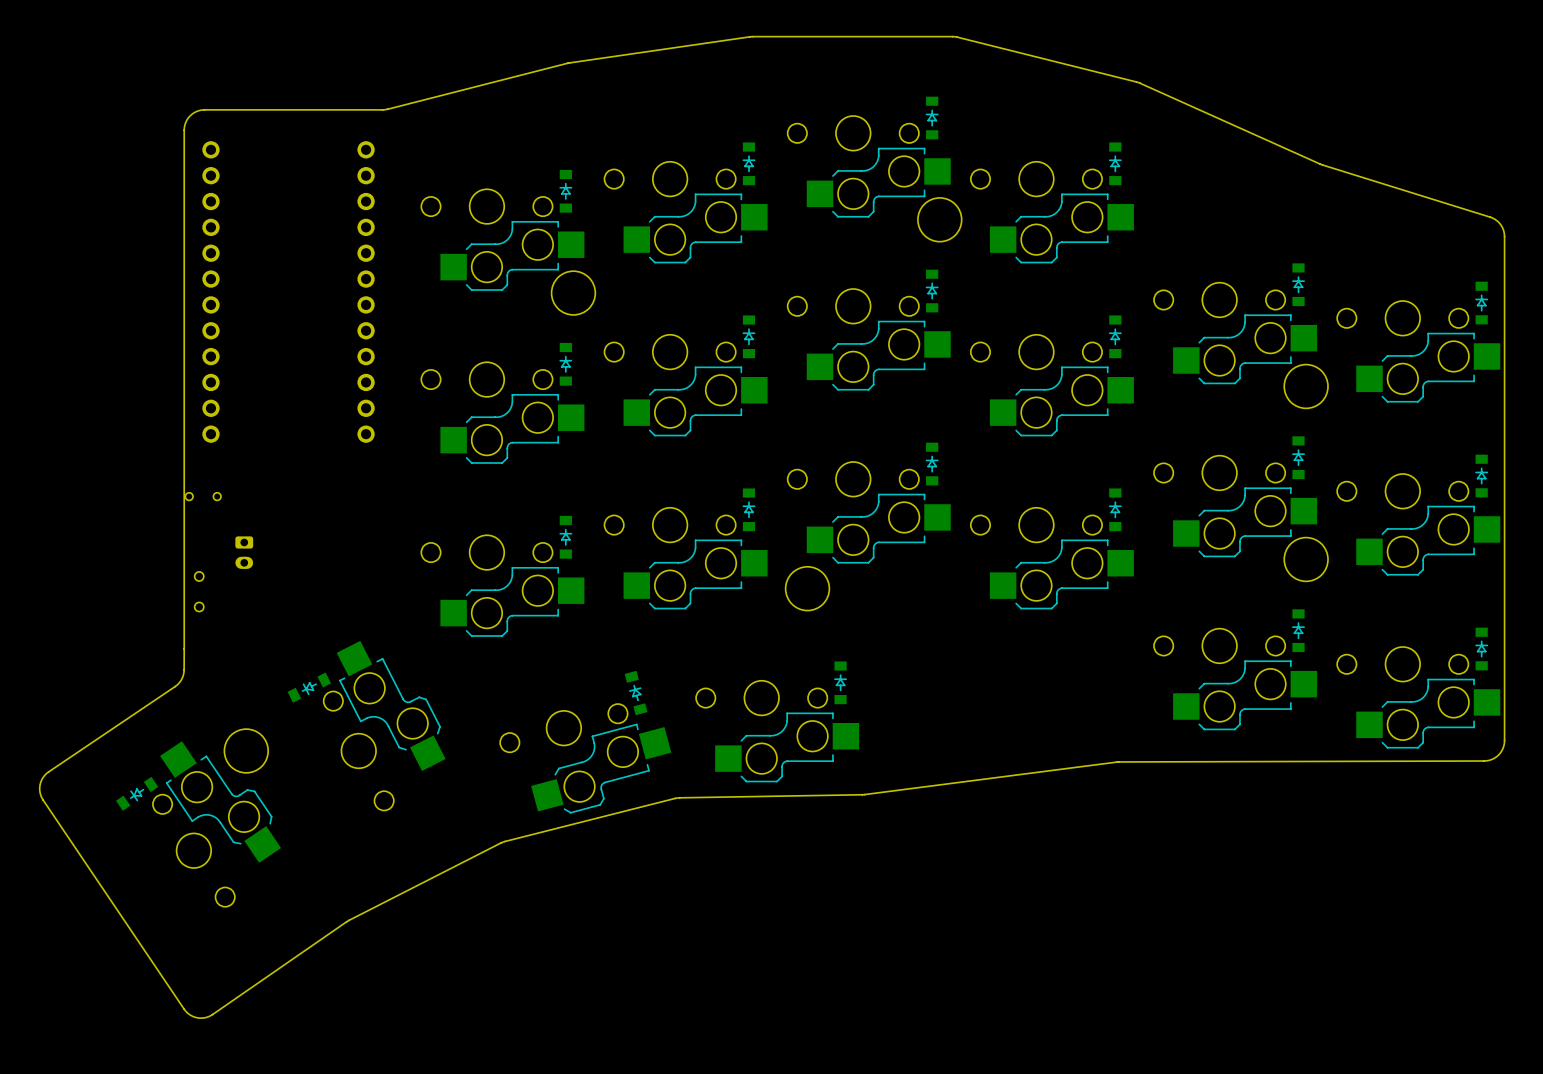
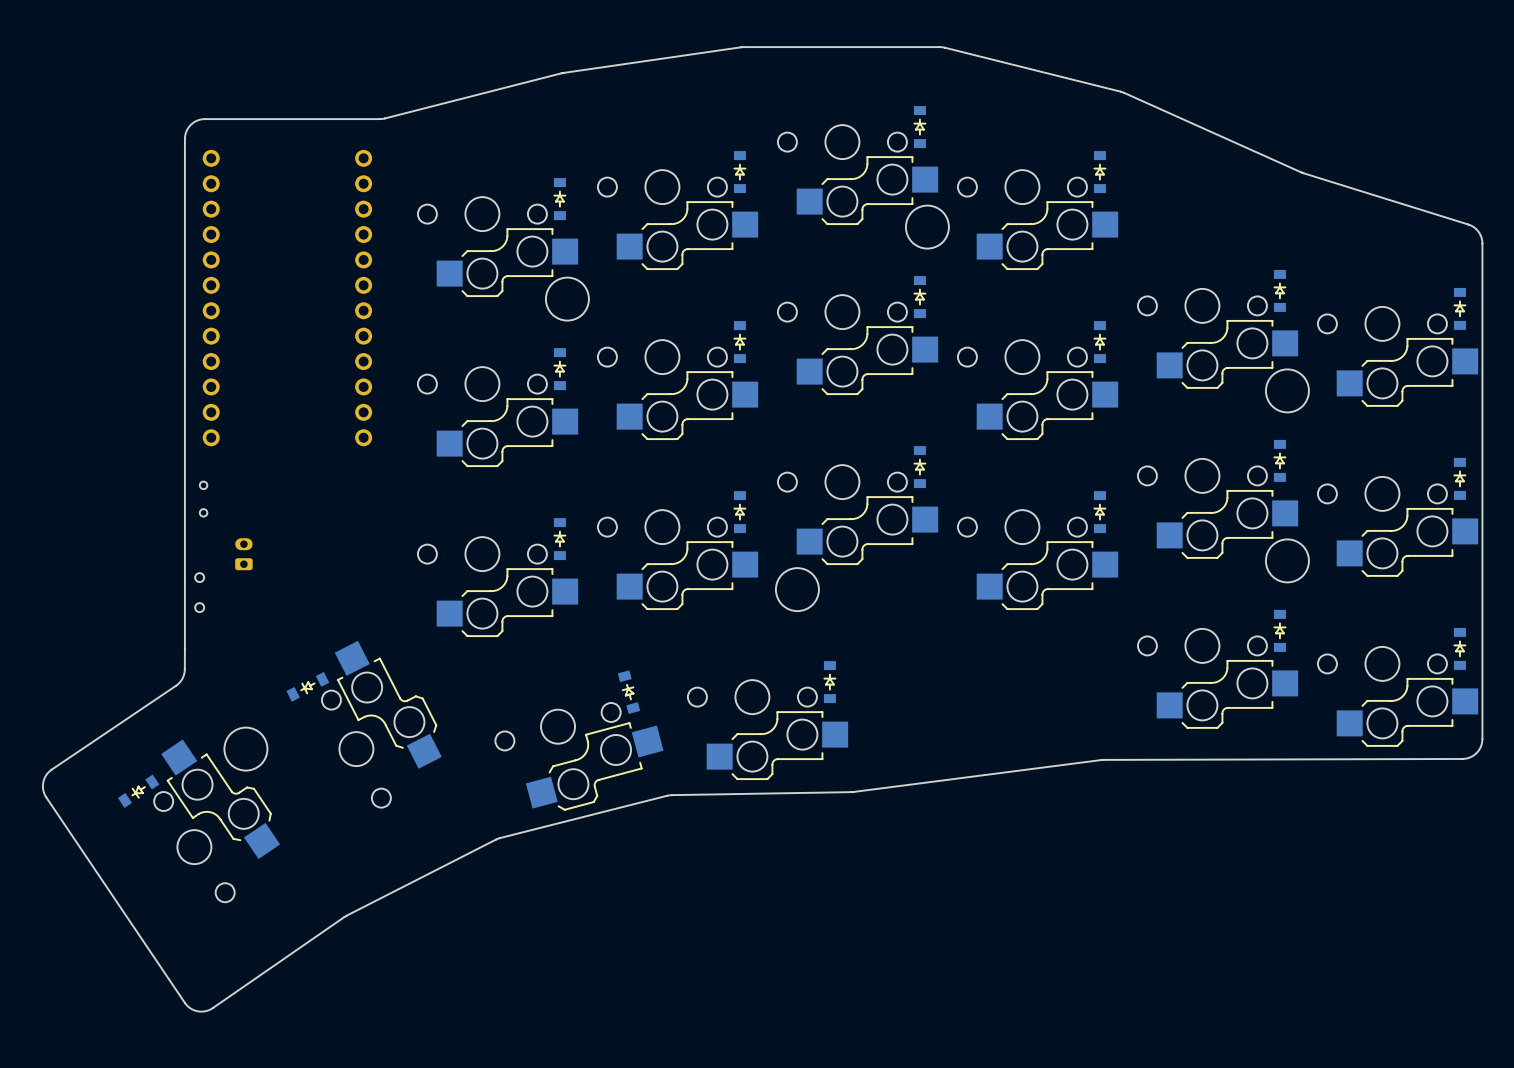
part rotation: 0° (203, 496) -> 90° clockwise (203, 499)
part rotation: 0° (244, 552) -> 180° (243, 554)

